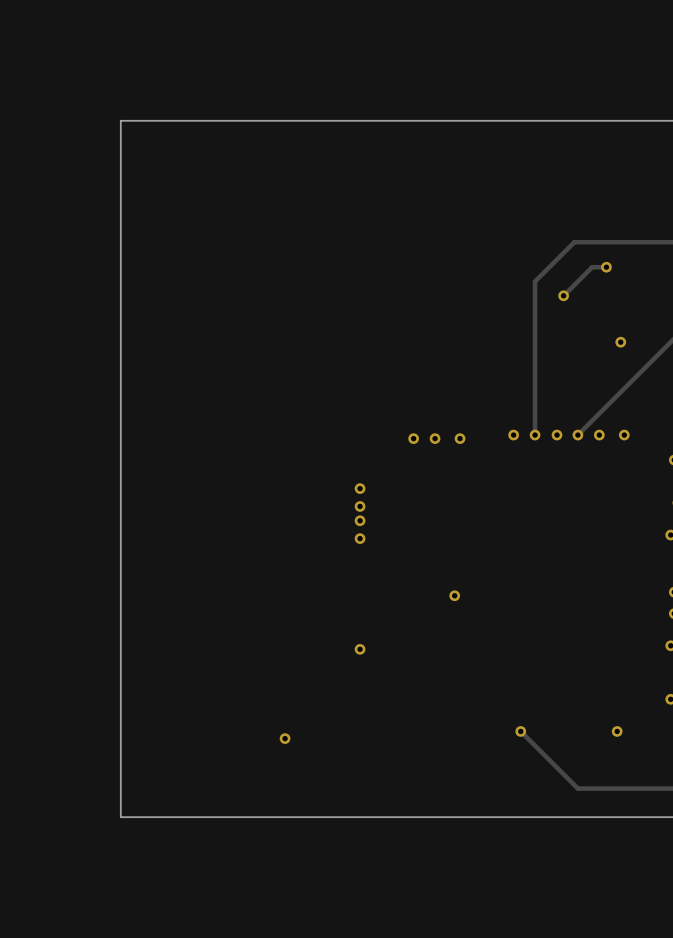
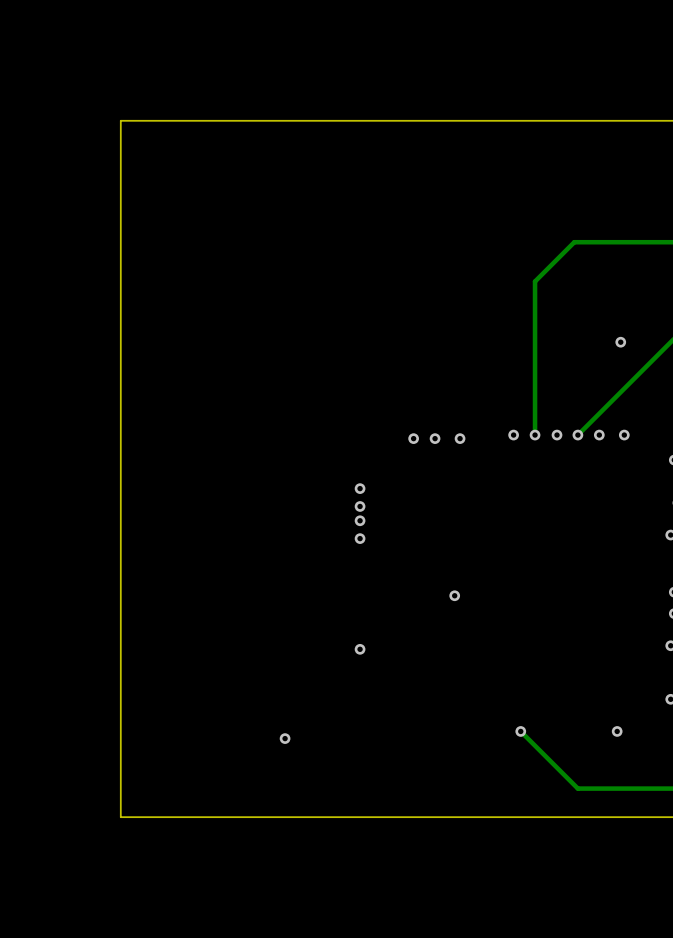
track: (606, 267) (592, 267) (563, 295) -> none
via: (606, 267) -> none
via: (563, 295) -> none

